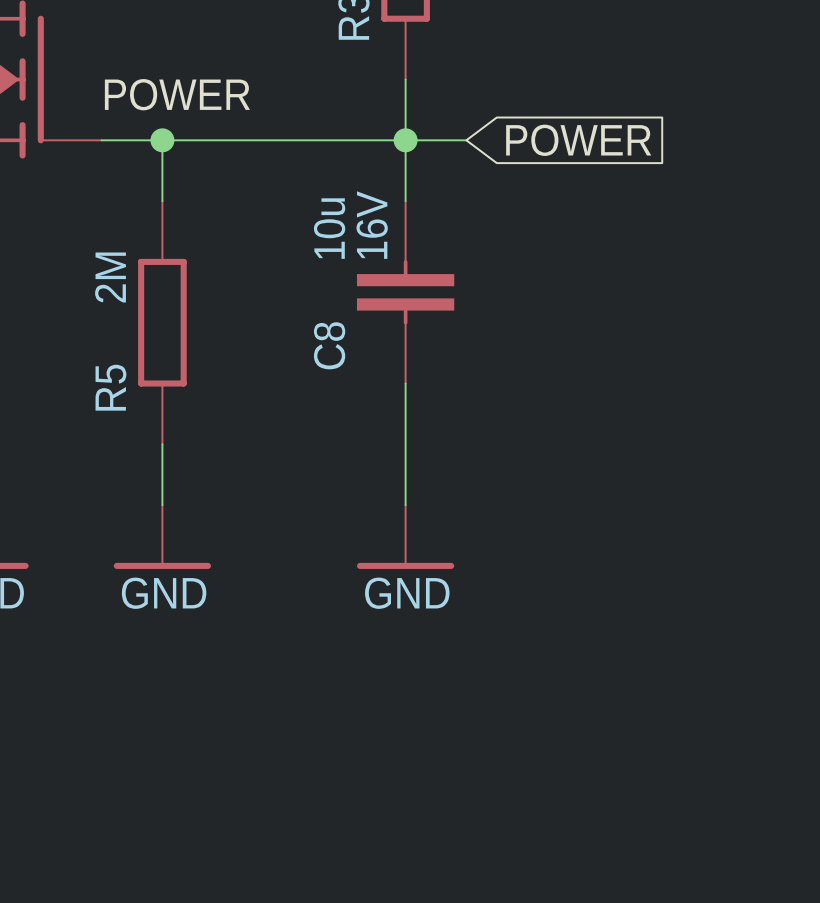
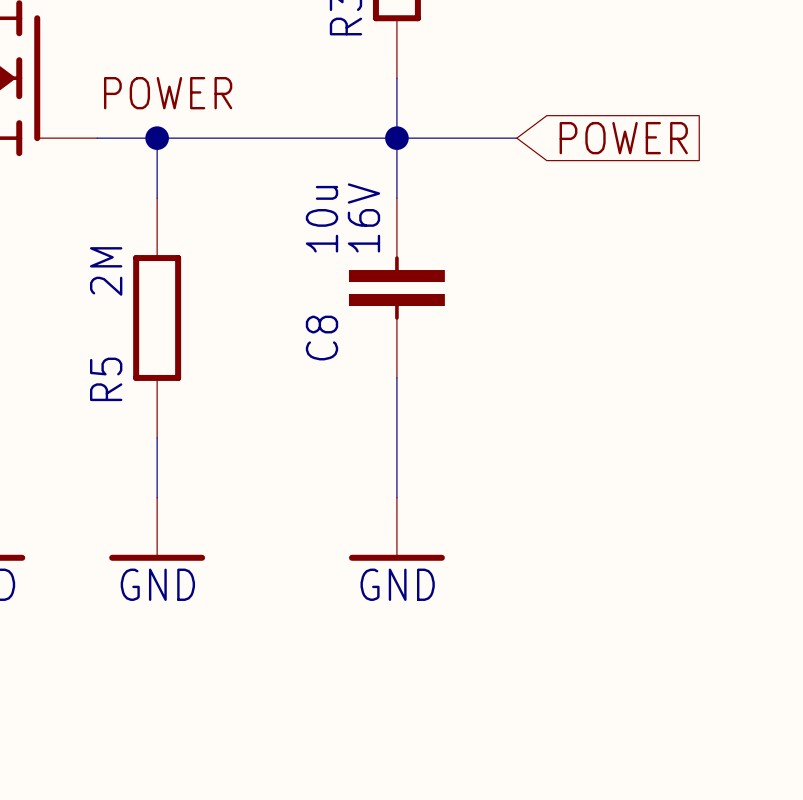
wire: none -> (456, 138) (516, 138)
global label position: POWER (578, 140) -> POWER (623, 138)

